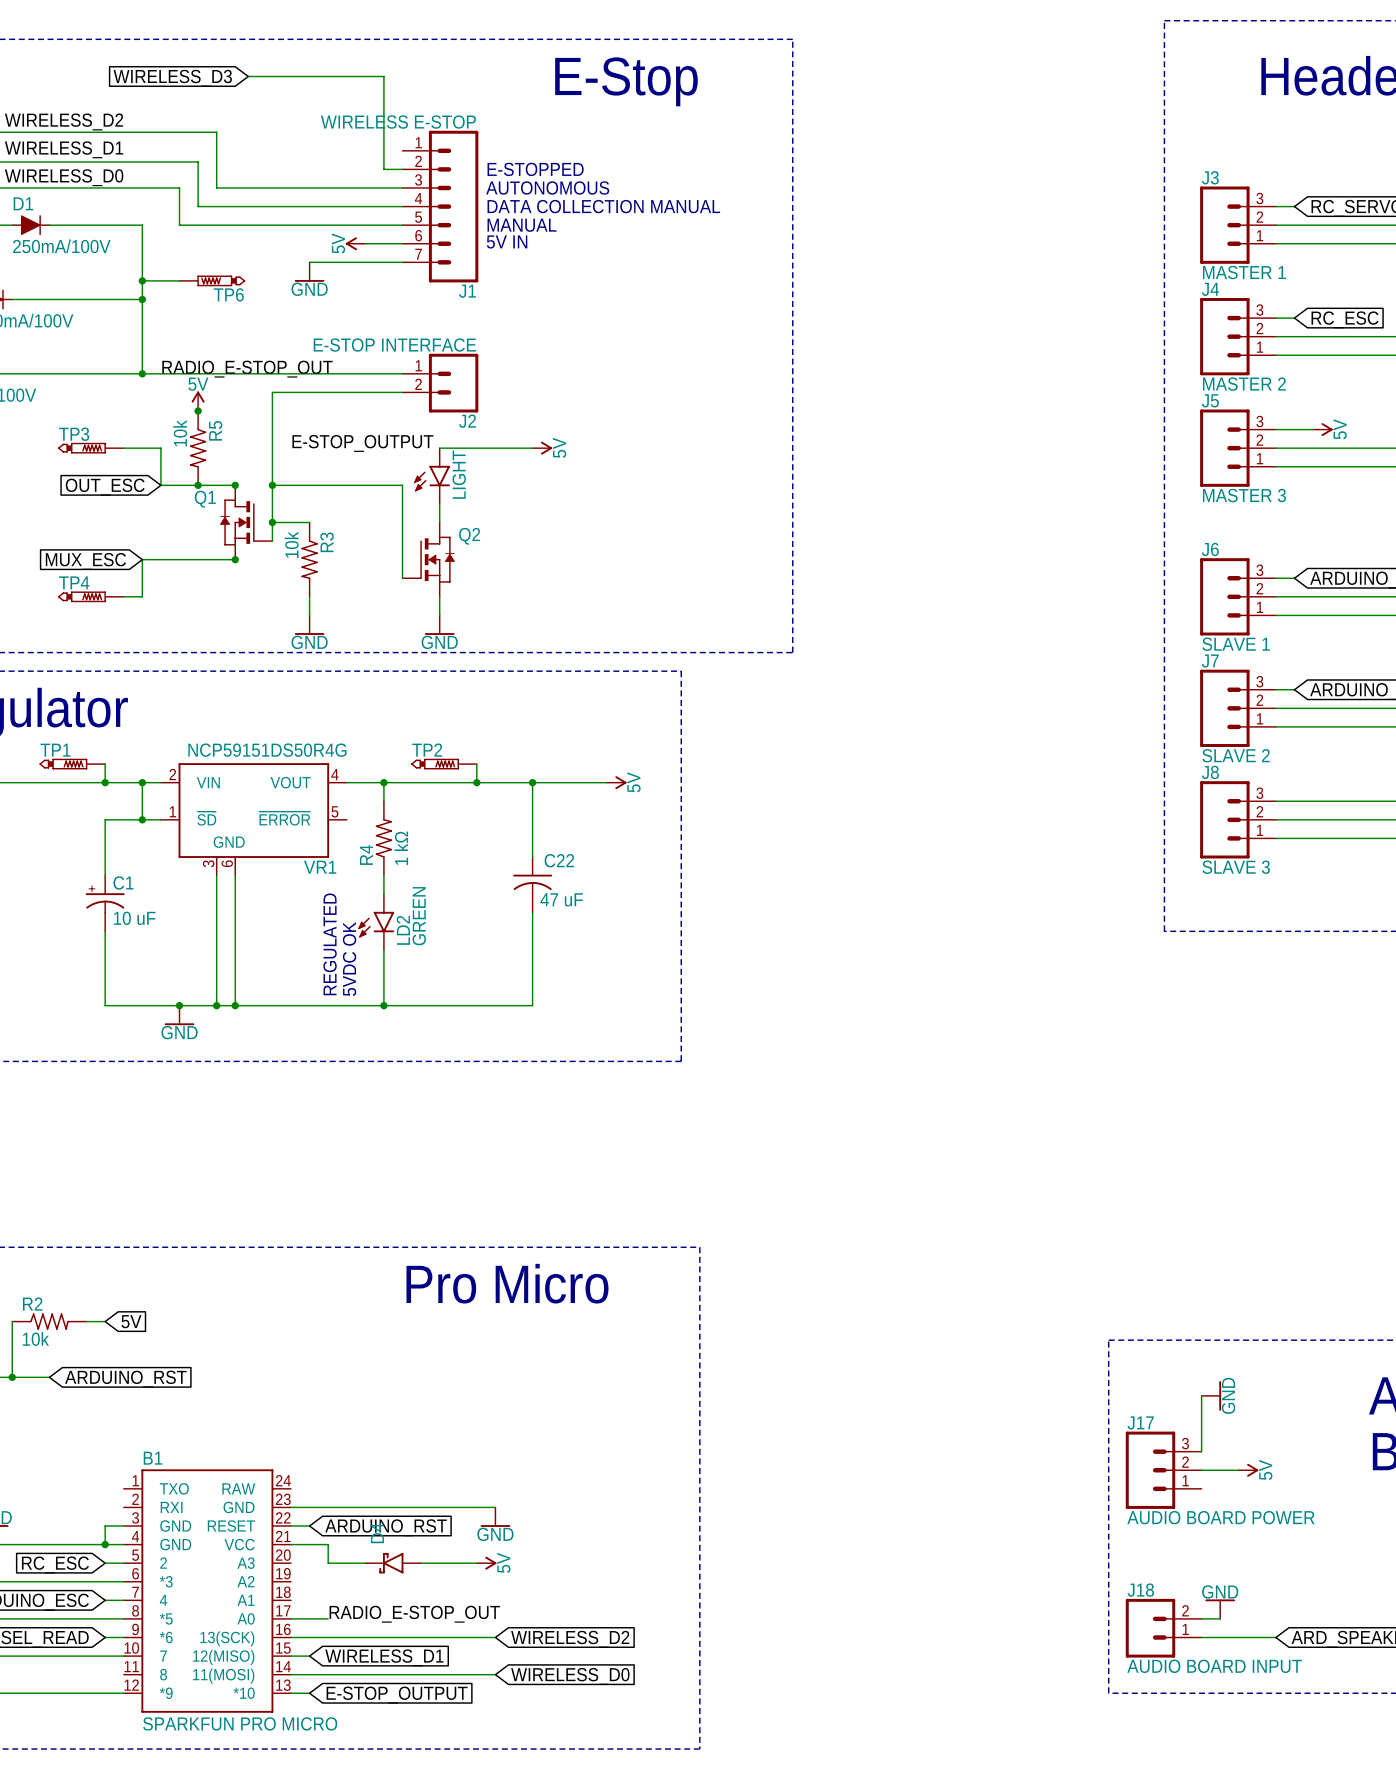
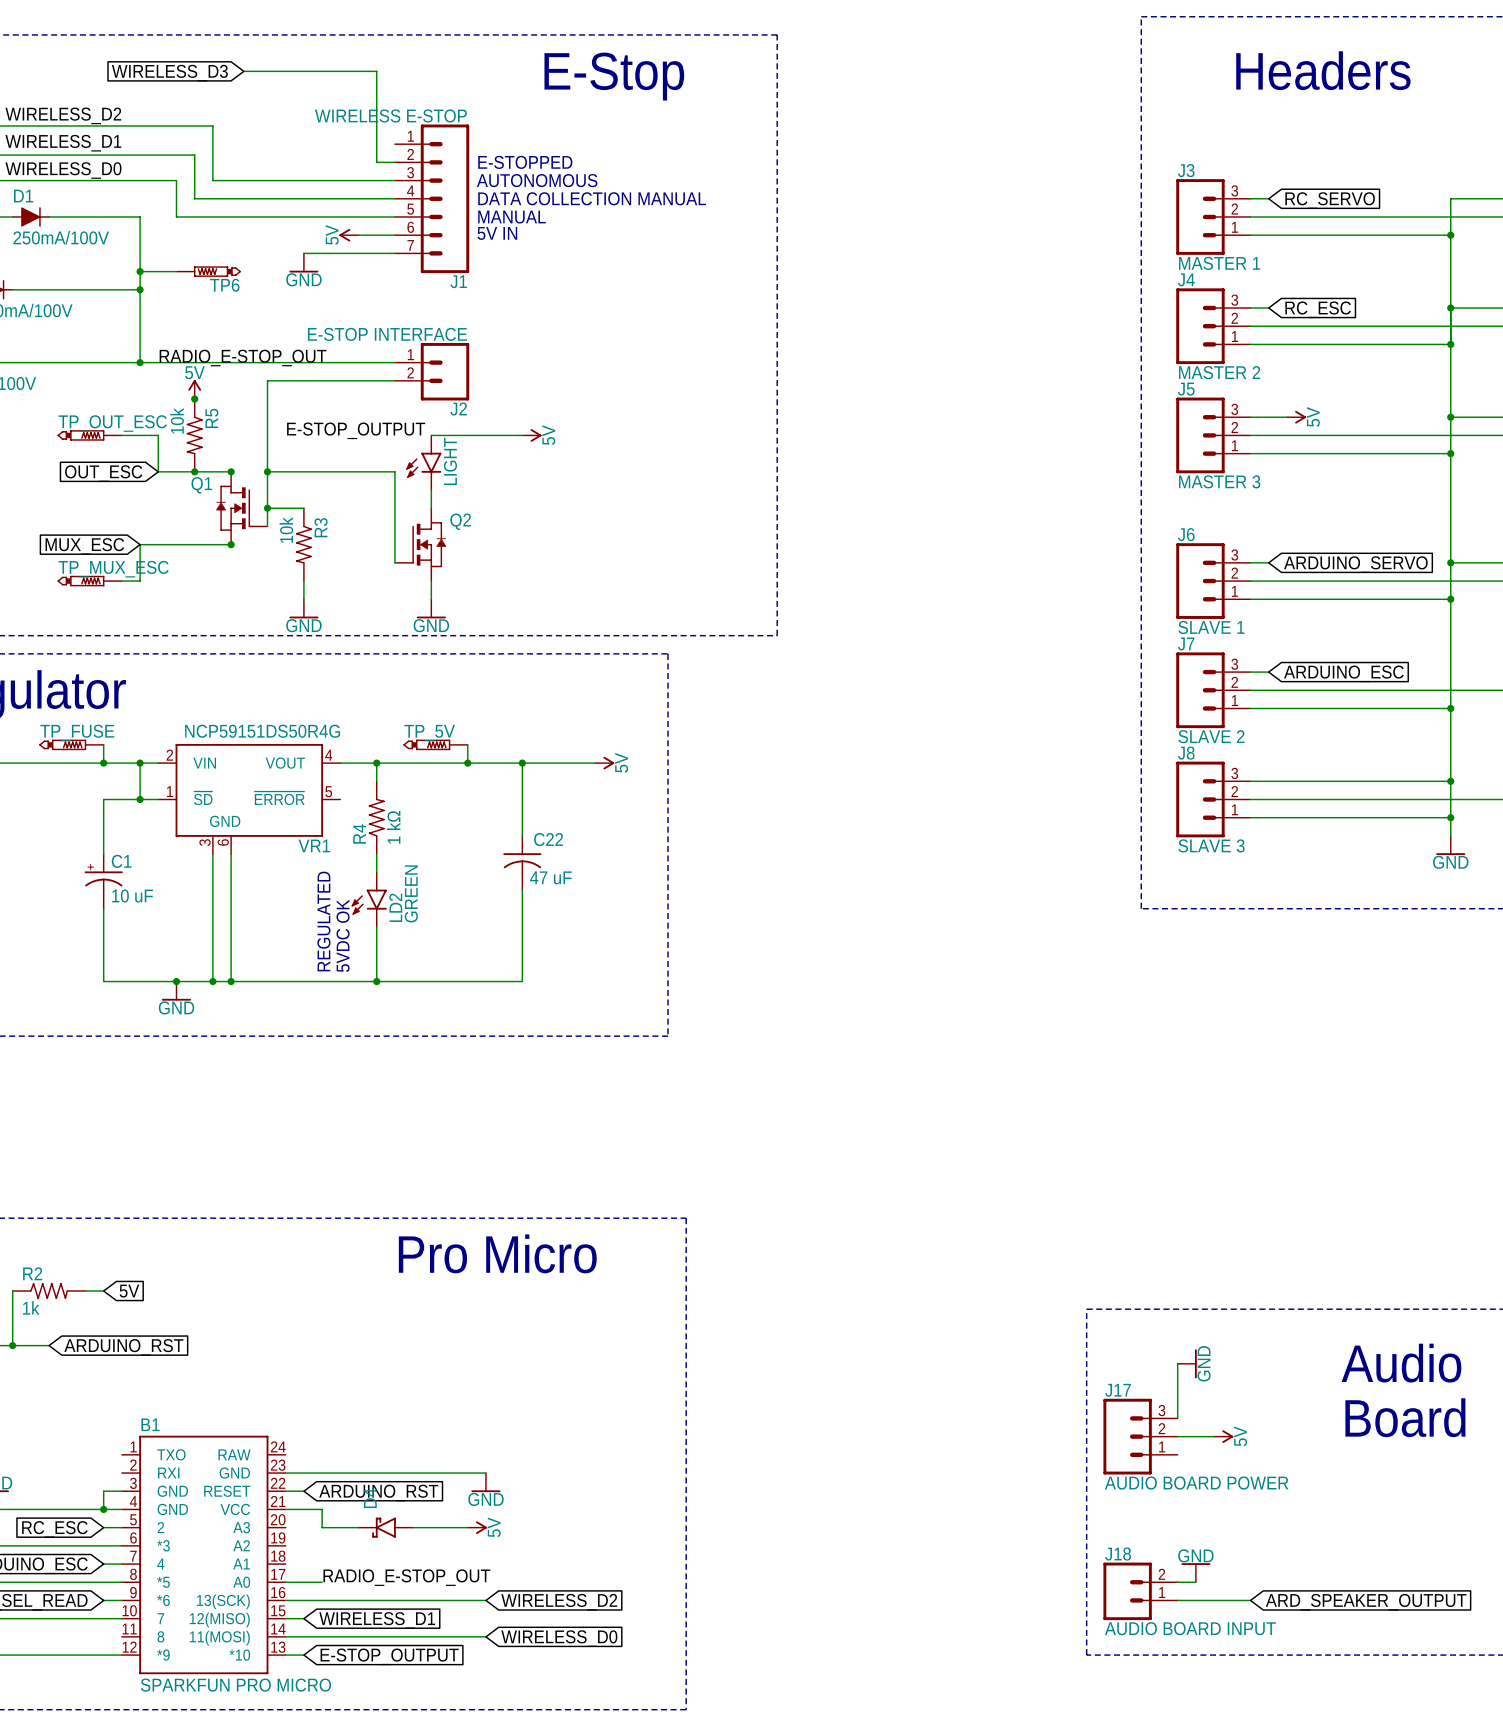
TP3 name: TP3 (74, 434) -> TP_OUT_ESC (112, 423)
TP4 name: TP4 (74, 582) -> TP_MUX_ESC (113, 569)
TP1 name: TP1 (55, 750) -> TP_FUSE (77, 732)
TP2 name: TP2 (427, 750) -> TP_5V (429, 733)
R2 value: 10k (35, 1338) -> 1k (31, 1307)

